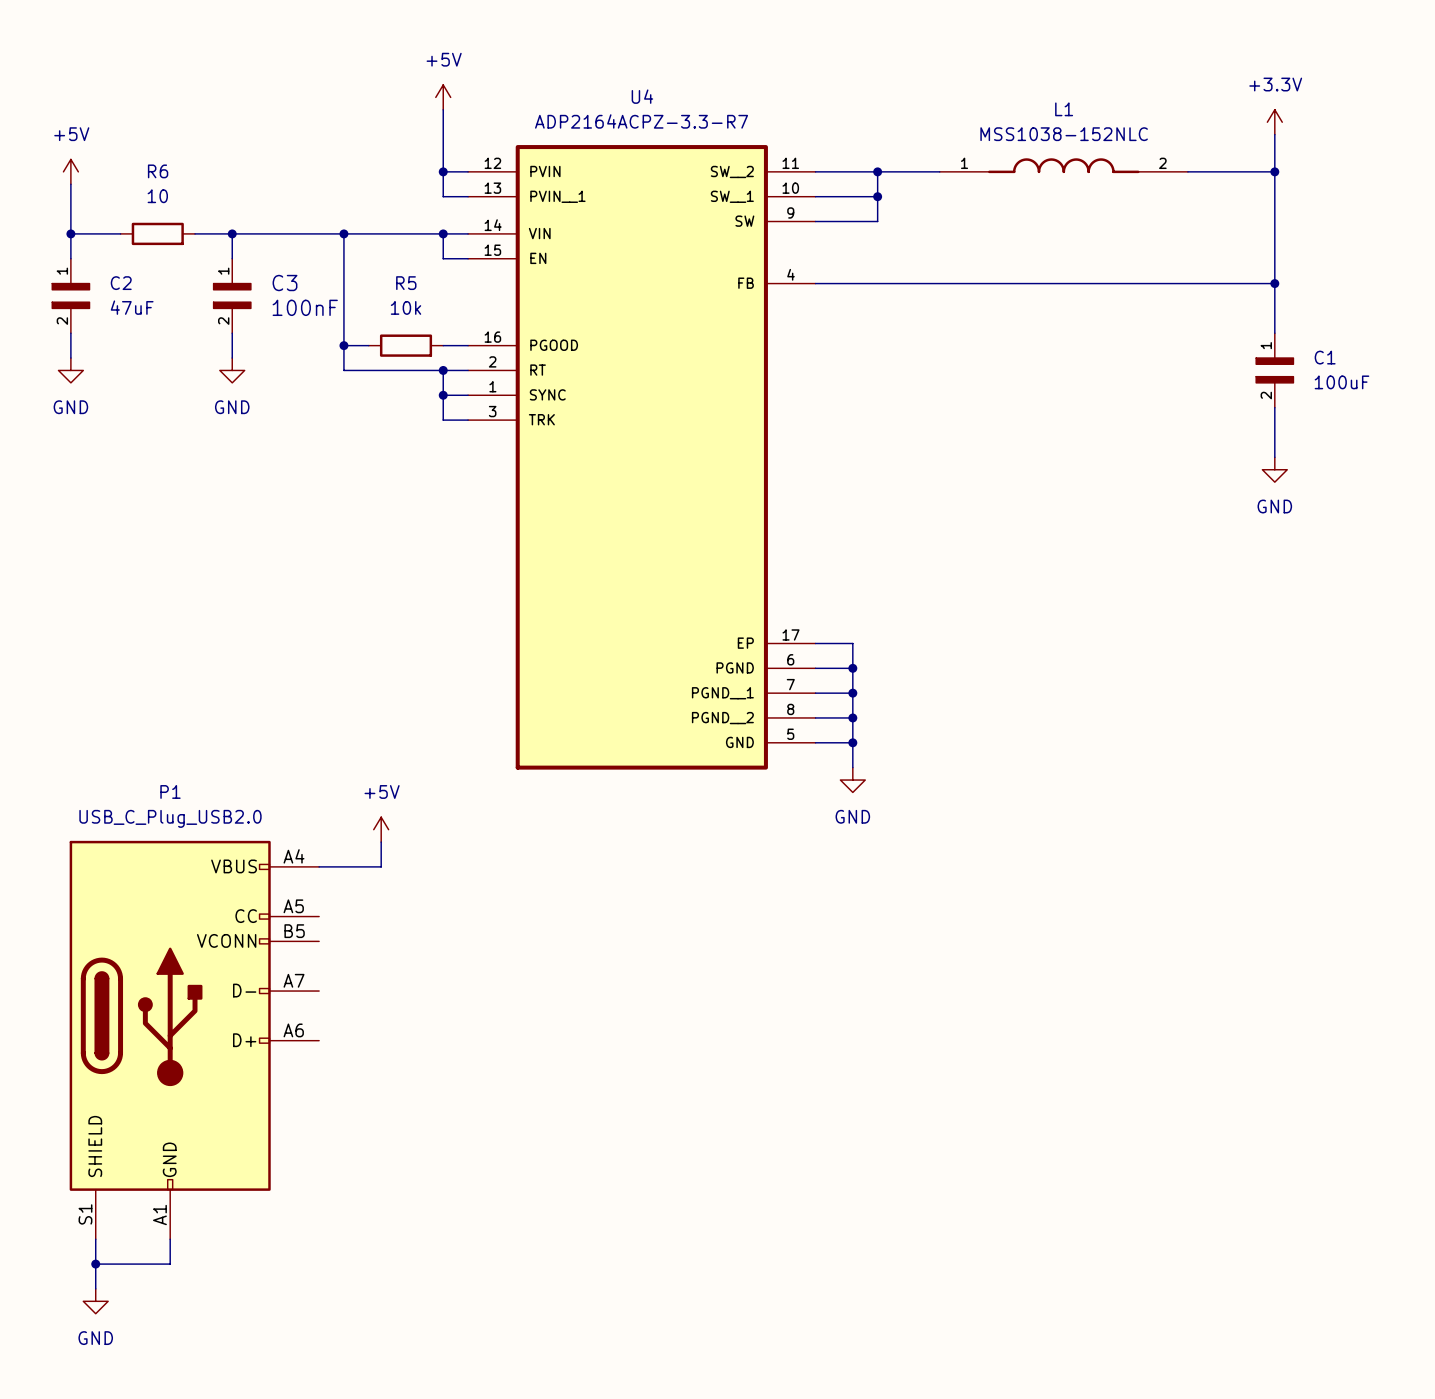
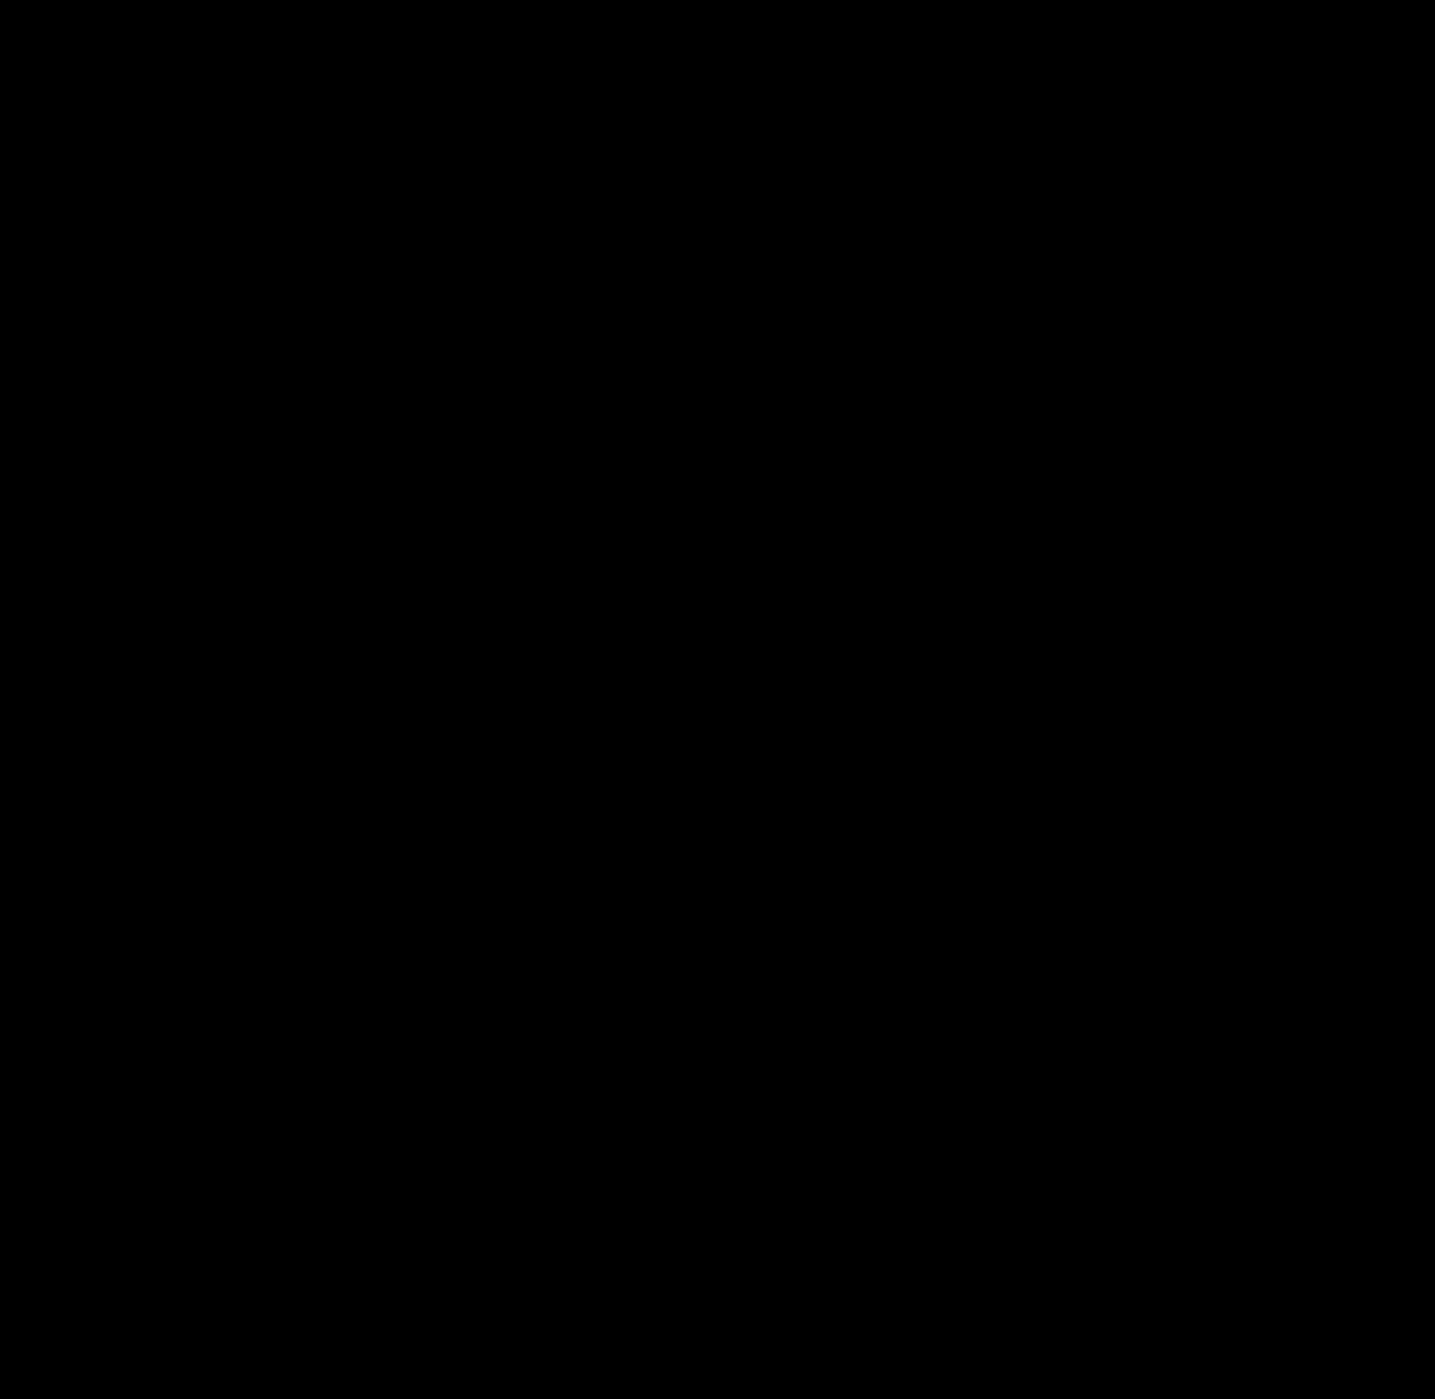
power symbol: +5V (443, 97) -> none
wire: (443, 109) (443, 196) (468, 196) -> none
power symbol: +3.3V (1274, 122) -> none
wire: (1274, 134) (1274, 333) -> none
L1: MSS1038-152NLC (1063, 165) -> none
power symbol: +5V (70, 171) -> none
wire: (443, 171) (468, 171) -> none
junction: (443, 171) -> none
wire: (815, 171) (939, 171) -> none
wire: (877, 171) (877, 221) (815, 221) -> none
junction: (877, 171) -> none
wire: (1187, 171) (1274, 171) -> none
junction: (1274, 171) -> none
wire: (70, 184) (70, 258) -> none
wire: (815, 196) (877, 196) -> none
junction: (877, 196) -> none
wire: (70, 233) (120, 233) -> none
junction: (70, 233) -> none
R6: 10 (157, 233) -> none
wire: (195, 233) (468, 233) -> none
wire: (232, 233) (232, 258) -> none
junction: (232, 233) -> none
wire: (343, 233) (343, 370) (468, 370) -> none
junction: (343, 233) -> none
wire: (443, 233) (443, 258) (468, 258) -> none
junction: (443, 233) -> none
wire: (815, 283) (1274, 283) -> none
junction: (1274, 283) -> none
C2: 47uF (70, 295) -> none
C3: 100nF (232, 295) -> none
wire: (70, 333) (70, 358) -> none
wire: (232, 333) (232, 358) -> none
wire: (343, 345) (368, 345) -> none
junction: (343, 345) -> none
R5: 10k (406, 345) -> none
wire: (443, 345) (468, 345) -> none
power symbol: GND (70, 370) -> none
power symbol: GND (232, 370) -> none
wire: (443, 370) (443, 420) (468, 420) -> none
junction: (443, 370) -> none
C1: 100uF (1274, 370) -> none
wire: (443, 395) (468, 395) -> none
junction: (443, 395) -> none
wire: (1274, 407) (1274, 457) -> none
U4: ADP2164ACPZ-3.3-R7 (641, 457) -> none
power symbol: GND (1274, 469) -> none
wire: (815, 643) (852, 643) (852, 767) -> none
wire: (815, 668) (852, 668) -> none
junction: (852, 668) -> none
wire: (815, 693) (852, 693) -> none
junction: (852, 693) -> none
wire: (815, 717) (852, 717) -> none
junction: (852, 717) -> none
wire: (815, 742) (852, 742) -> none
junction: (852, 742) -> none
power symbol: GND (852, 780) -> none
power symbol: +5V (381, 829) -> none
wire: (381, 842) (381, 866) (319, 866) -> none
P1: USB_C_Plug_USB2.0 (194, 1040) -> none
wire: (95, 1239) (95, 1288) -> none
wire: (170, 1239) (170, 1264) (95, 1264) -> none
junction: (95, 1264) -> none
power symbol: GND (95, 1301) -> none

